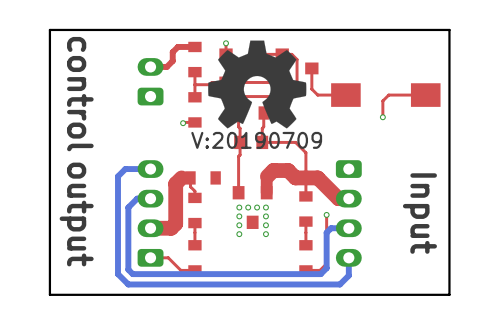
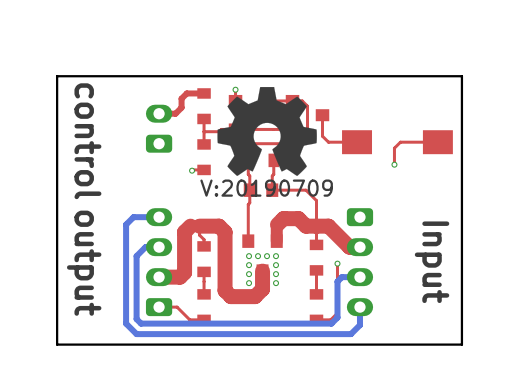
top track: none -> (199, 226) (219, 226) (225, 232) (225, 290) (231, 296) (255, 296) (262, 289) (262, 271)
part: (203, 177) -> none

